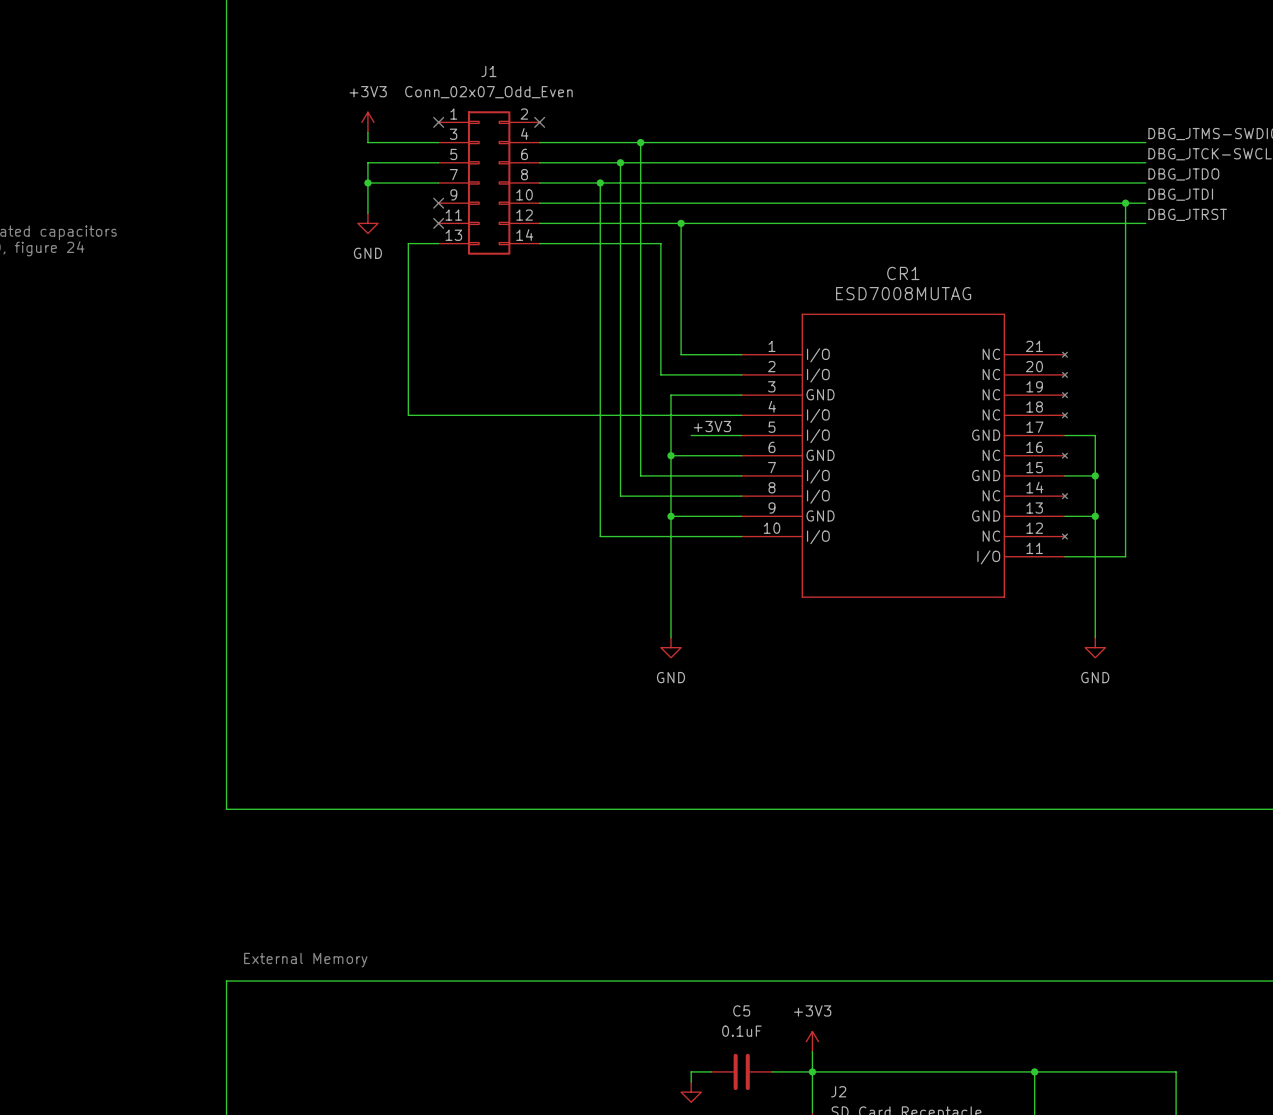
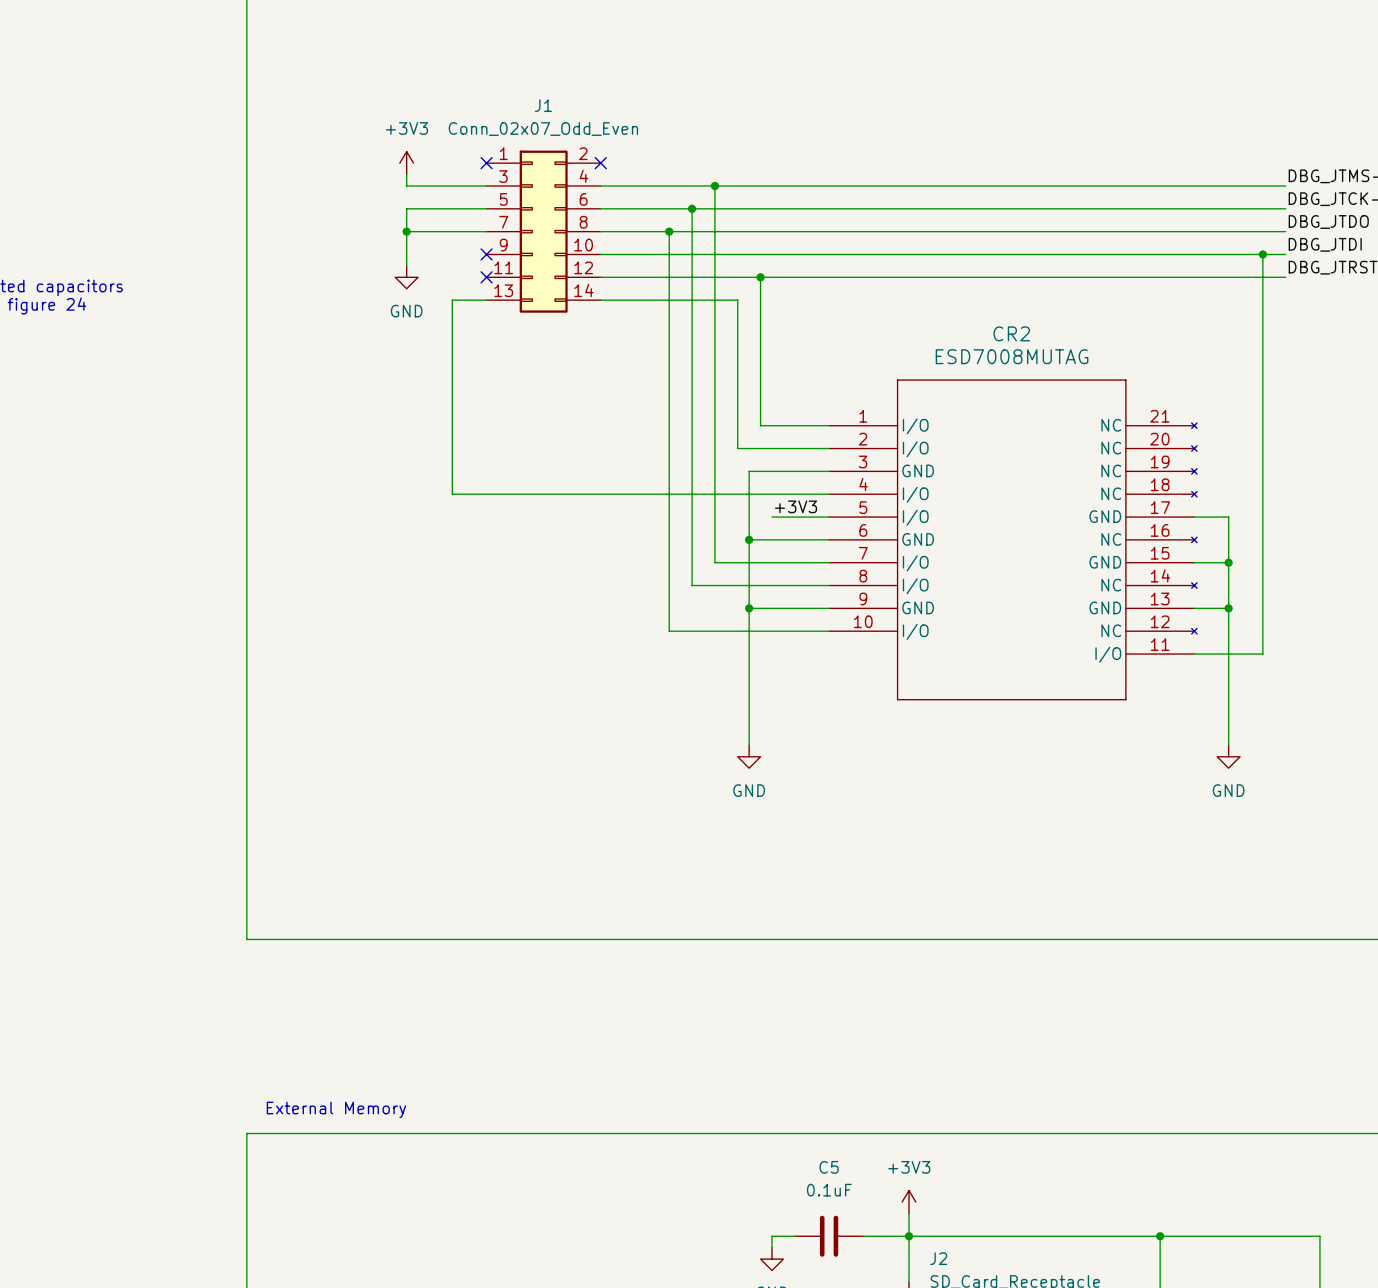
CR1 name: CR1 (903, 273) -> CR2 (1011, 333)

